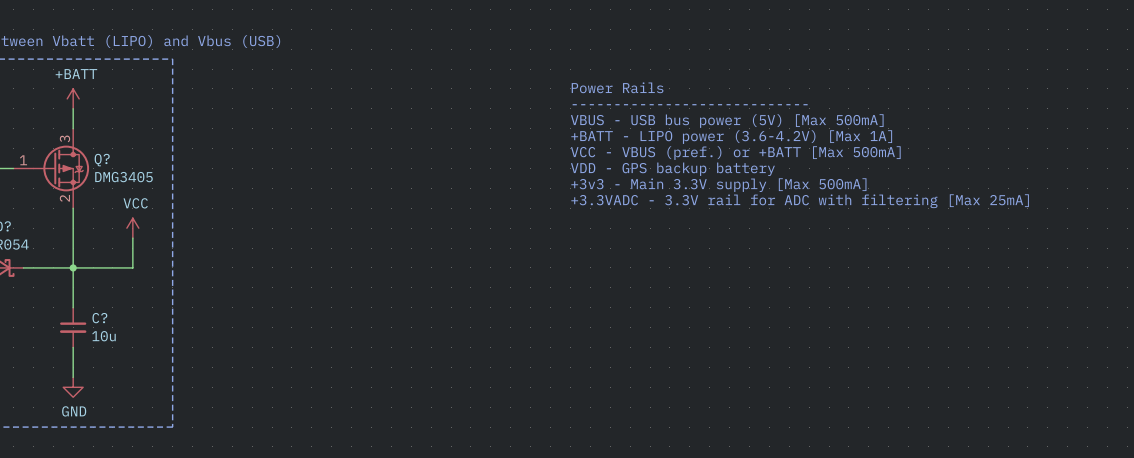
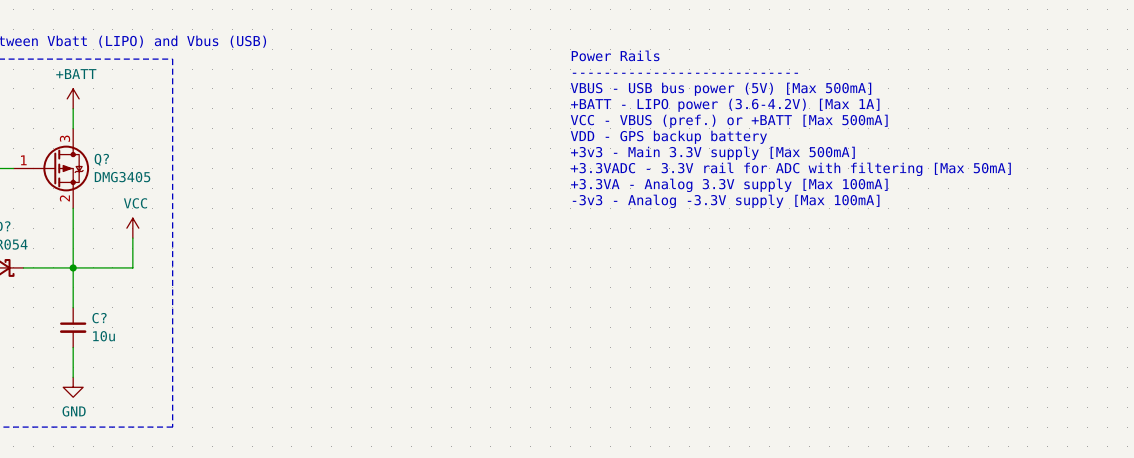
text: none -> Power Rails (615, 55)
text: none -> ---------------------------- (685, 73)
text: Power Rails (617, 87) -> VBUS - USB bus power (5V) [Max 500mA] (721, 89)
text: ---------------------------- (690, 104) -> +BATT - LIPO power (3.6-4.2V) [Max 1A] (725, 105)
text: VBUS - USB bus power (5V) [Max 500mA] (727, 121) -> VCC - VBUS (pref.) or +BATT [Max 500mA] (729, 121)
text: +BATT - LIPO power (3.6-4.2V) [Max 1A] (731, 137) -> VDD - GPS backup battery (668, 137)
text: VCC - VBUS (pref.) or +BATT [Max 500mA] (735, 153) -> +3v3 - Main 3.3V supply [Max 500mA] (712, 153)
text: VDD - GPS backup battery (672, 169) -> +3.3VADC - 3.3V rail for ADC with filtering [Max 50mA] (790, 169)
text: +3v3 - Main 3.3V supply [Max 500mA] (718, 185) -> +3.3VA - Analog 3.3V supply [Max 100mA] (729, 185)
text: +3.3VADC - 3.3V rail for ADC with filtering [Max 25mA] (800, 201) -> -3v3 - Analog -3.3V supply [Max 100mA] (726, 201)

